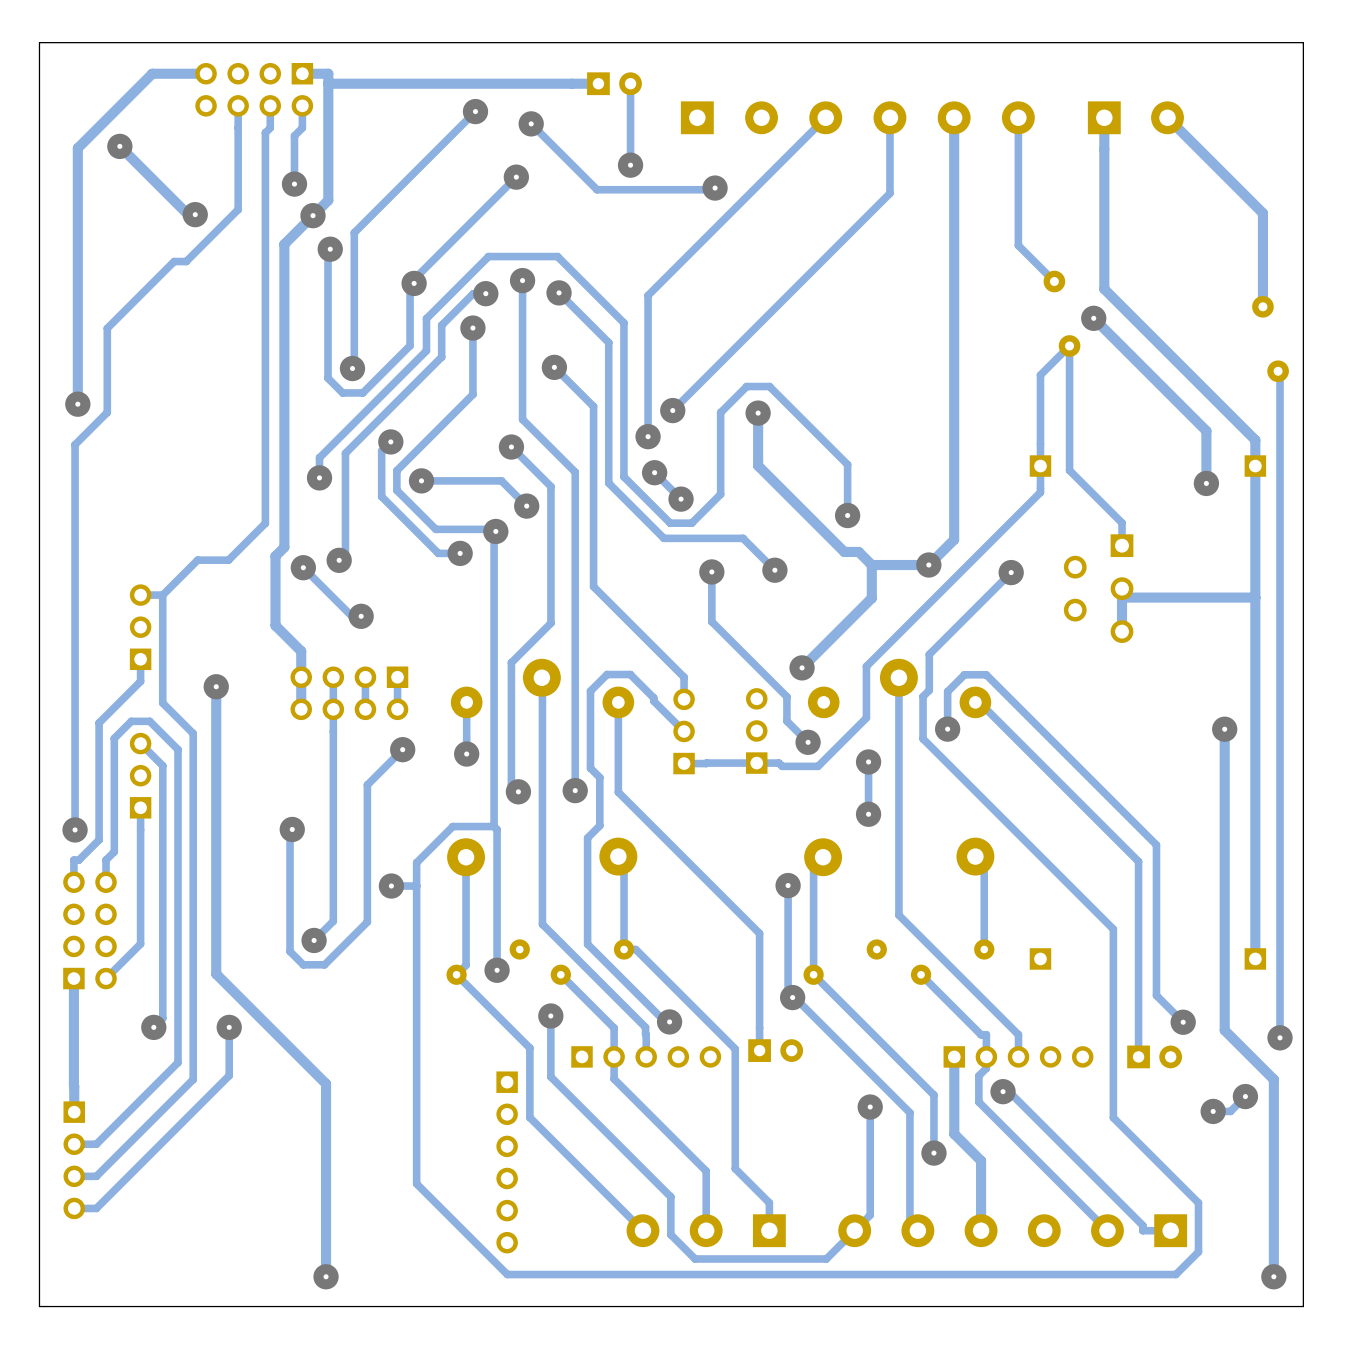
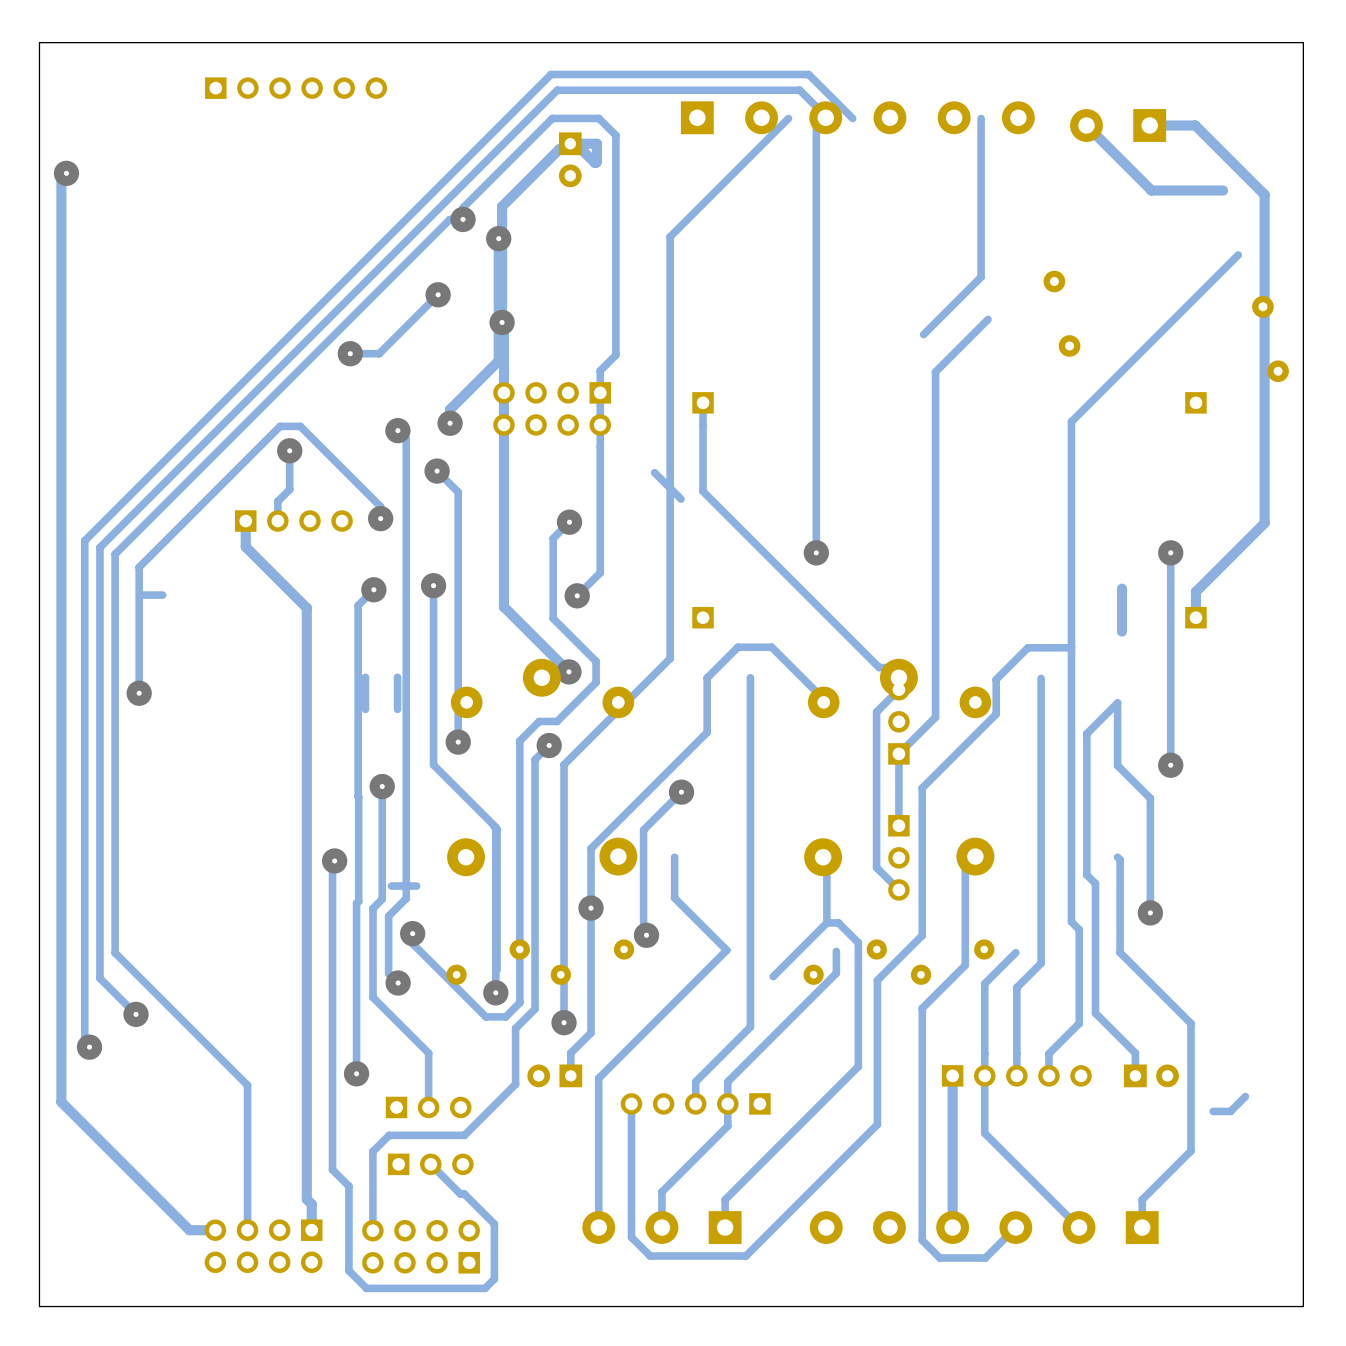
track: (206, 73) (152, 73) (77, 148) (77, 404) -> none
track: (302, 73) (328, 73) (328, 200) (284, 244) (284, 547) (275, 556) (275, 625) (301, 651) (301, 709) -> none
track: (598, 83) (328, 83) -> none
part rotation: 0° (614, 83) -> 90° clockwise (570, 159)
part position: (614, 83) -> (570, 159)
track: (630, 83) (630, 165) -> none
part: none -> (296, 88)
part: (254, 89) -> none
track: (238, 105) (238, 209) (186, 261) (174, 261) (107, 328) (107, 412) (75, 444) (75, 829) -> none
track: (270, 105) (270, 127) (265, 132) (265, 523) (228, 560) (197, 560) (162, 595) (162, 703) (193, 733) (193, 1079) (96, 1176) (74, 1176) -> none
track: (302, 105) (302, 127) (294, 135) (294, 184) -> none
track: (475, 111) (354, 232) (354, 366) (352, 368) -> none
via: (475, 111) -> none
track: (825, 117) (648, 295) (648, 436) -> none
track: (889, 117) (889, 193) (672, 410) -> none
track: (954, 117) (954, 539) (928, 565) (871, 565) -> none
track: (1018, 117) (1018, 245) (1054, 281) -> none
track: (1104, 117) (1104, 289) (1255, 440) (1255, 958) -> none
part rotation: 0° (1135, 117) -> 180° (1118, 125)
track: (1167, 117) (1262, 213) (1262, 306) -> none
track: none -> (788, 118) (670, 236) (670, 658) (564, 764) (564, 1022)
track: none -> (852, 118) (808, 74) (551, 74) (84, 540) (84, 1042) (89, 1047)
track: none -> (981, 118) (981, 277) (923, 334)
track: (531, 123) (597, 189) (713, 189) (715, 188) -> none
via: (531, 123) -> none
track: none -> (1086, 125) (1151, 190) (1223, 190)
track: none -> (1149, 125) (1195, 125) (1264, 194) (1264, 523) (1195, 591) (1195, 617)
track: none -> (570, 143) (596, 143) (596, 161) (594, 162) (581, 149) (559, 149) (502, 206) (503, 606) (568, 671)
track: (119, 146) (188, 214) (195, 214) -> none
via position: (119, 146) -> (66, 173)
via: (630, 165) -> none
track: none -> (66, 173) (61, 178) (61, 1102) (189, 1230) (215, 1230)
track: (516, 177) (414, 279) (414, 283) (410, 287) (410, 345) (362, 392) (342, 392) (328, 378) (328, 251) (330, 249) -> none
via: (516, 177) -> none
via: (294, 184) -> none
via: (715, 188) -> none
via: (195, 214) -> none
via: (313, 215) -> none
via: none -> (463, 219)
via: none -> (498, 238)
track: none -> (502, 238) (498, 238) (498, 360) (450, 409) (450, 423)
via: (330, 249) -> none
track: none -> (1238, 254) (1071, 421) (1071, 921) (1079, 929) (1079, 1023) (1048, 1053) (1048, 1075)
track: (522, 280) (522, 419) (575, 472) (575, 790) -> none
via: (522, 280) -> none
via: (414, 283) -> none
track: (559, 292) (608, 342) (608, 483) (663, 538) (743, 538) (774, 570) -> none
via: (559, 292) -> none
track: (485, 293) (473, 293) (441, 325) (441, 357) (345, 453) (345, 554) (339, 560) -> none
via: (485, 293) -> none
track: none -> (438, 294) (379, 353) (350, 353)
via: none -> (438, 294)
track: (1093, 318) (1206, 430) (1206, 483) -> none
via: (1093, 318) -> none
track: none -> (988, 319) (935, 371) (935, 717) (898, 753)
via: none -> (502, 322)
track: (472, 328) (472, 394) (396, 470) (396, 490) (435, 529) (493, 529) (495, 531) (494, 533) (494, 826) (452, 826) (416, 862) (416, 1183) (507, 1274) (1175, 1274) (1198, 1251) (1198, 1202) (1113, 1117) (1113, 929) (923, 738) (923, 696) (929, 690) (929, 654) (1011, 572) -> none
via: (472, 328) -> none
track: (554, 367) (593, 406) (593, 586) (684, 677) (684, 699) -> none
via: (554, 367) -> none
via position: (352, 368) -> (350, 353)
track: (1278, 371) (1280, 373) (1280, 1037) -> none
track: none -> (703, 402) (703, 491) (879, 667) (898, 667) (898, 677)
part: none -> (703, 402)
part: none -> (1195, 402)
via: (77, 404) -> none
part: none -> (552, 408)
via: (672, 410) -> none
track: (758, 413) (758, 465) (844, 551) (858, 551) (871, 565) -> none
via: (758, 413) -> none
via: none -> (450, 423)
track: none -> (397, 430) (406, 438) (406, 898) (388, 916) (388, 973) (398, 983)
via: (648, 436) -> none
track: (390, 441) (381, 451) (381, 496) (438, 553) (460, 553) -> none
via position: (390, 441) -> (397, 430)
track: (511, 447) (550, 486) (550, 623) (511, 662) (511, 784) (518, 791) -> none
via: (511, 447) -> none
track: none -> (289, 450) (289, 489) (277, 501) (277, 521)
via: none -> (289, 450)
part: (1040, 466) -> none
part: (1255, 466) -> none
track: none -> (437, 471) (458, 492) (458, 742)
via: (654, 472) -> none
track: (319, 477) (319, 457) (426, 350) (426, 318) (488, 256) (557, 256) (623, 322) (623, 476) (670, 523) (691, 523) (720, 494) (720, 412) (746, 386) (769, 386) (847, 464) (847, 515) -> none
via: (319, 477) -> none
track: (421, 480) (501, 480) (526, 506) -> none
via position: (421, 480) -> (437, 471)
via: (1206, 483) -> none
via: (681, 499) -> none
via: (526, 506) -> none
via: (847, 515) -> none
track: none -> (380, 518) (380, 506) (300, 426) (280, 426) (139, 567) (139, 693)
via: none -> (380, 518)
track: none -> (245, 521) (245, 546) (306, 608) (306, 1199) (311, 1204) (311, 1230)
part: none -> (293, 521)
track: none -> (569, 522) (553, 538) (553, 618) (596, 661) (596, 682) (557, 721) (539, 721) (519, 740) (519, 1002) (505, 1016) (485, 1016) (412, 943) (412, 933)
via: none -> (569, 522)
via: (495, 531) -> none
track: (1122, 545) (1122, 522) (1069, 470) (1069, 345) (1040, 375) (1040, 492) (866, 666) (866, 717) (818, 766) (782, 766) (778, 763) (684, 763) -> none
track: none -> (816, 552) (816, 106) (799, 90) (557, 90) (99, 547) (99, 978) (136, 1014)
via: none -> (816, 552)
track: none -> (1170, 552) (1170, 765)
via: none -> (1170, 552)
via: (460, 553) -> none
via: (339, 560) -> none
track: (871, 565) (871, 598) (802, 667) -> none
via: (928, 565) -> none
track: (303, 567) (351, 616) (361, 616) -> none
via: (303, 567) -> none
via: (774, 570) -> none
track: (711, 571) (711, 621) (786, 696) (786, 721) (808, 742) -> none
via: (711, 571) -> none
via: (1011, 572) -> none
track: none -> (433, 585) (433, 765) (495, 827) (495, 992)
via: none -> (433, 585)
part: (1098, 588) -> none
track: none -> (373, 589) (358, 605) (358, 901) (356, 903) (356, 1073)
via: none -> (373, 589)
track: none -> (577, 595) (600, 572) (600, 370) (615, 355) (615, 135) (598, 118) (552, 118) (463, 207) (463, 219) (449, 219) (115, 554) (115, 952) (247, 1085) (247, 1230)
via: none -> (577, 595)
track: (1255, 597) (1122, 597) -> none
via: (361, 616) -> none
part: none -> (703, 617)
part: none -> (1195, 617)
part: (140, 627) -> none
track: none -> (1071, 647) (1027, 647) (996, 679) (996, 714) (922, 788) (922, 935) (877, 980) (877, 1124) (745, 1256) (650, 1256) (631, 1237) (631, 1103)
track: (140, 659) (140, 681) (99, 722) (99, 839) (78, 860) (73, 860) (73, 882) -> none
via: (802, 667) -> none
via: none -> (568, 671)
track: (333, 677) (333, 921) (314, 940) -> none
track: (541, 677) (542, 924) (645, 1027) (646, 1056) -> none
track: none -> (750, 677) (750, 1027) (695, 1081) (695, 1103)
track: none -> (1041, 678) (1041, 963) (1016, 987) (1016, 1075)
track: (216, 686) (216, 974) (326, 1083) (326, 1276) -> none
via: (216, 686) -> none
track: (898, 689) (898, 753) -> (898, 689) (876, 712) (876, 867) (898, 889)
via: none -> (139, 693)
part: (349, 693) -> none
track: (466, 702) (466, 754) -> none
track: (618, 702) (618, 792) (759, 933) (759, 1050) -> none
track: none -> (826, 702) (771, 647) (737, 647) (707, 677) (707, 732) (591, 848) (591, 1032) (570, 1053) (570, 1075)
track: (975, 702) (979, 702) (1138, 861) (1138, 1056) -> none
part: none -> (898, 721)
track: (947, 729) (947, 691) (964, 674) (986, 674) (1156, 845) (1156, 995) (1183, 1022) -> none
via: (947, 729) -> none
track: (1224, 729) (1224, 1030) (1273, 1079) (1273, 1276) -> none
via position: (1224, 729) -> (1170, 765)
part: (756, 730) -> none
track: (684, 731) (630, 674) (607, 674) (590, 691) (590, 768) (599, 777) (599, 825) (587, 837) (587, 944) (665, 1021) (669, 1021) -> none
part: (684, 731) -> none
via: (808, 742) -> none
track: (140, 743) (162, 765) (162, 1018) (153, 1027) -> none
track: none -> (549, 745) (535, 759) (535, 1009) (515, 1028) (515, 1084) (464, 1135) (389, 1135) (372, 1151) (372, 1230)
via: none -> (549, 745)
track: (402, 749) (367, 784) (367, 922) (324, 964) (303, 964) (290, 951) (290, 831) (292, 829) -> none
via: (402, 749) -> none
via position: (466, 754) -> (458, 742)
track: (868, 761) (868, 814) -> none
via: (868, 761) -> none
part: (140, 775) -> none
track: none -> (382, 786) (382, 899) (373, 908) (373, 997) (428, 1053) (428, 1107)
via: none -> (382, 786)
via: (575, 790) -> none
via: (518, 791) -> none
track: none -> (681, 792) (643, 830) (643, 932) (646, 935)
via: none -> (681, 792)
track: (140, 807) (140, 943) (106, 978) -> none
via: (868, 814) -> none
track: (898, 825) (898, 915) (1018, 1034) (1018, 1056) -> none
via: (75, 829) -> none
via: (292, 829) -> none
track: (618, 856) (624, 862) (624, 949) (635, 949) (735, 1048) (735, 1168) (769, 1202) (769, 1230) -> none
track: none -> (826, 856) (826, 922)
track: (975, 856) (984, 865) (984, 949) -> none
track: (466, 857) (466, 965) (456, 974) (529, 1048) (529, 1117) (642, 1230) -> none
track: none -> (674, 857) (674, 898) (726, 950) (598, 1078) (598, 1227)
track: (823, 857) (813, 866) (813, 974) (933, 1095) (933, 1153) -> none
part: none -> (898, 857)
track: none -> (965, 857) (965, 965) (922, 1008) (922, 1240) (939, 1258) (985, 1258) (1015, 1227)
track: none -> (1117, 857) (1120, 859) (1120, 952) (1190, 1023) (1190, 1150) (1142, 1199) (1142, 1227)
track: none -> (334, 860) (332, 863) (332, 1169) (348, 1186) (348, 1270) (366, 1288) (485, 1288) (494, 1279) (494, 1223) (430, 1164)
via: none -> (334, 860)
track: (106, 882) (106, 860) (114, 851) (114, 738) (131, 721) (149, 721) (178, 749) (178, 1062) (96, 1144) (74, 1144) -> none
track: (788, 885) (788, 993) (909, 1112) (909, 1222) (917, 1230) -> none
via: (788, 885) -> none
via: (391, 886) -> none
via: none -> (591, 908)
track: none -> (1150, 912) (1150, 798) (1117, 765) (1117, 703) (1086, 733) (1086, 874) (1095, 883) (1095, 1013) (1135, 1053) (1135, 1075)
via: none -> (1150, 912)
track: none -> (826, 922) (838, 922) (858, 942) (858, 1066) (725, 1199) (725, 1227)
track: none -> (826, 922) (773, 976)
part: (89, 930) -> none
via: none -> (412, 933)
via: none -> (646, 935)
via: (314, 940) -> none
track: none -> (836, 951) (836, 973) (727, 1081) (727, 1126) (661, 1191) (661, 1227)
track: none -> (1015, 952) (984, 983) (984, 1133) (1079, 1227)
part: (1040, 958) -> none
part: (1255, 958) -> none
via position: (497, 970) -> (495, 992)
track: (560, 974) (614, 1028) (614, 1079) (706, 1171) (706, 1230) -> none
track: (921, 974) (981, 1034) (986, 1034) (986, 1068) (978, 1075) (978, 1102) (1107, 1230) -> none
track: (73, 978) (74, 1112) -> none
via: none -> (398, 983)
via: (792, 997) -> none
track: (550, 1016) (550, 1076) (670, 1196) (670, 1234) (695, 1258) (826, 1258) (870, 1215) (870, 1107) -> none
via position: (550, 1016) -> (564, 1022)
via: (669, 1021) -> none
via: (1183, 1022) -> none
via position: (153, 1027) -> (136, 1014)
track: (229, 1027) (229, 1075) (96, 1208) (74, 1208) -> none
via: (229, 1027) -> none
via: (1280, 1037) -> none
via: none -> (89, 1047)
part: (775, 1050) -> none
part rotation: 0° (646, 1056) -> 180° (695, 1103)
track: (954, 1056) (954, 1134) (981, 1160) (981, 1230) -> none
part position: (1018, 1056) -> (1016, 1075)
part position: (1154, 1056) -> (1151, 1075)
via: none -> (356, 1073)
part: none -> (554, 1075)
track: none -> (952, 1075) (952, 1227)
track: (1003, 1091) (1009, 1091) (1142, 1225) (1142, 1230) (1170, 1230) -> none
via: (1003, 1091) -> none
via: (1245, 1096) -> none
part: none -> (428, 1107)
via: (870, 1107) -> none
via: (1213, 1111) -> none
via: (933, 1153) -> none
part: (74, 1160) -> none
part: (507, 1162) -> none
part: none -> (430, 1164)
part position: (706, 1230) -> (661, 1227)
part position: (1012, 1230) -> (984, 1227)
part: none -> (263, 1246)
part: none -> (421, 1246)
via: (326, 1276) -> none
via: (1273, 1276) -> none

